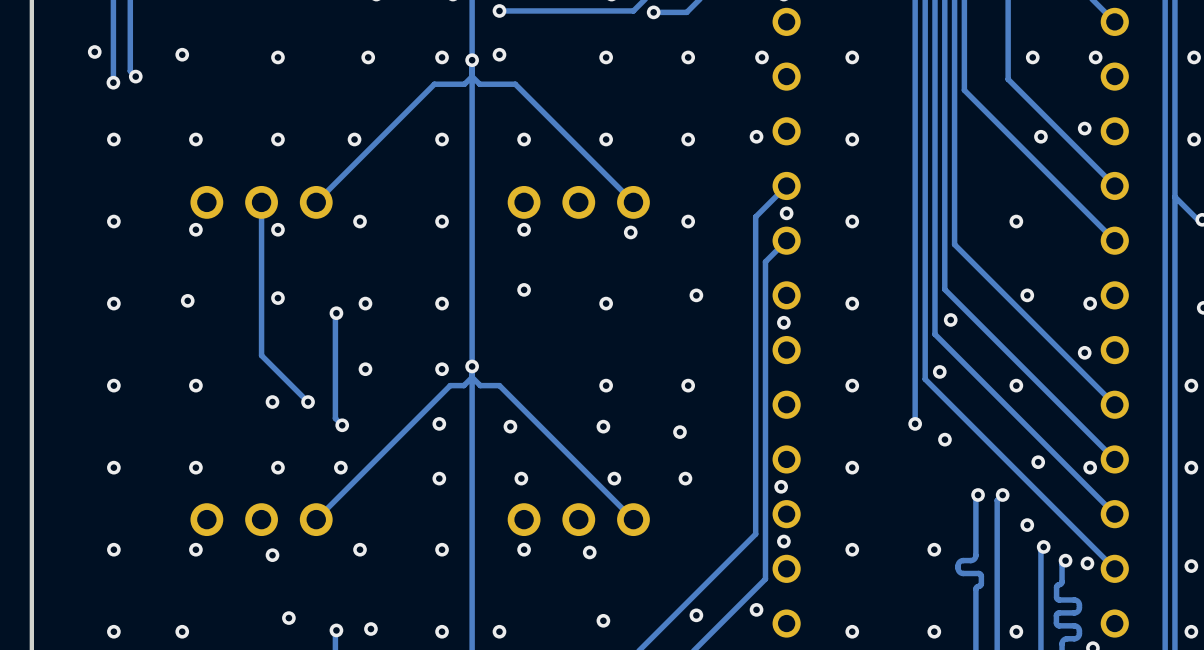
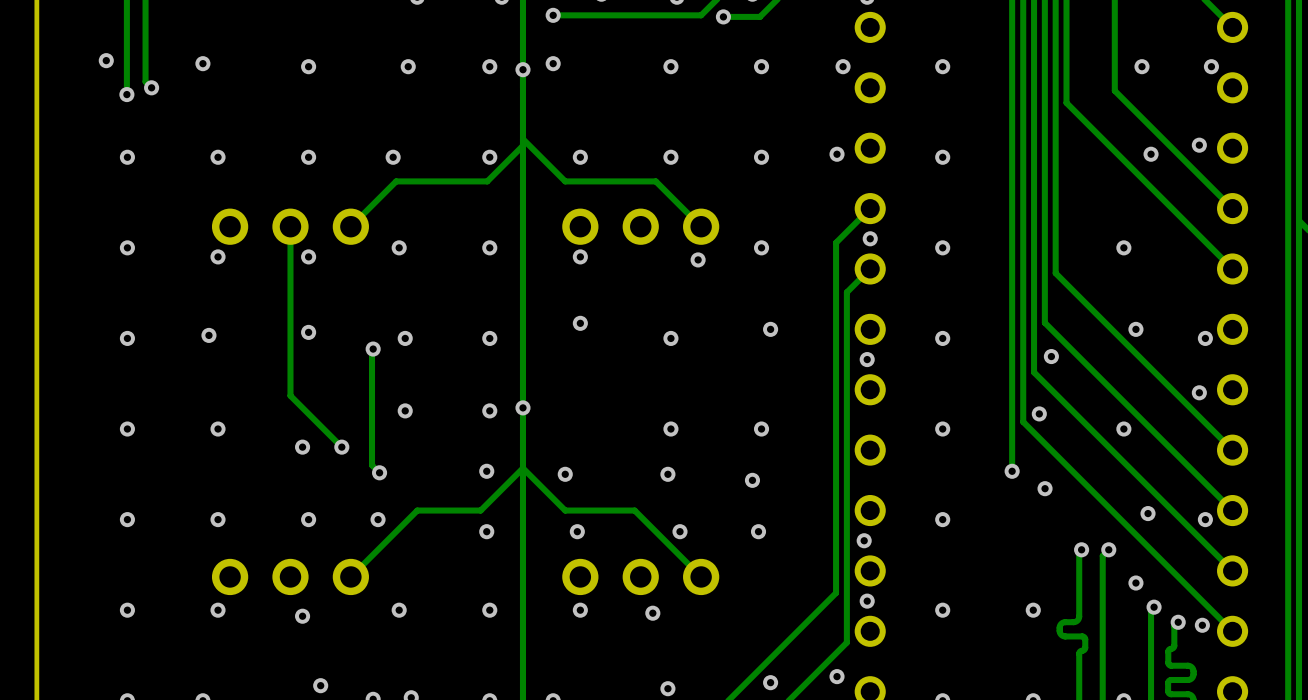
track: none -> (522, 145) (487, 181) (396, 181)
track: (592, 161) (515, 84) (479, 84) (472, 76) (464, 84) (434, 84) (357, 161) -> (655, 181) (565, 181) (522, 139)
track: (573, 459) (499, 385) (480, 385) (472, 377) (463, 385) (450, 385) (376, 459) -> (634, 510) (565, 510) (522, 468) (480, 510) (417, 510)

